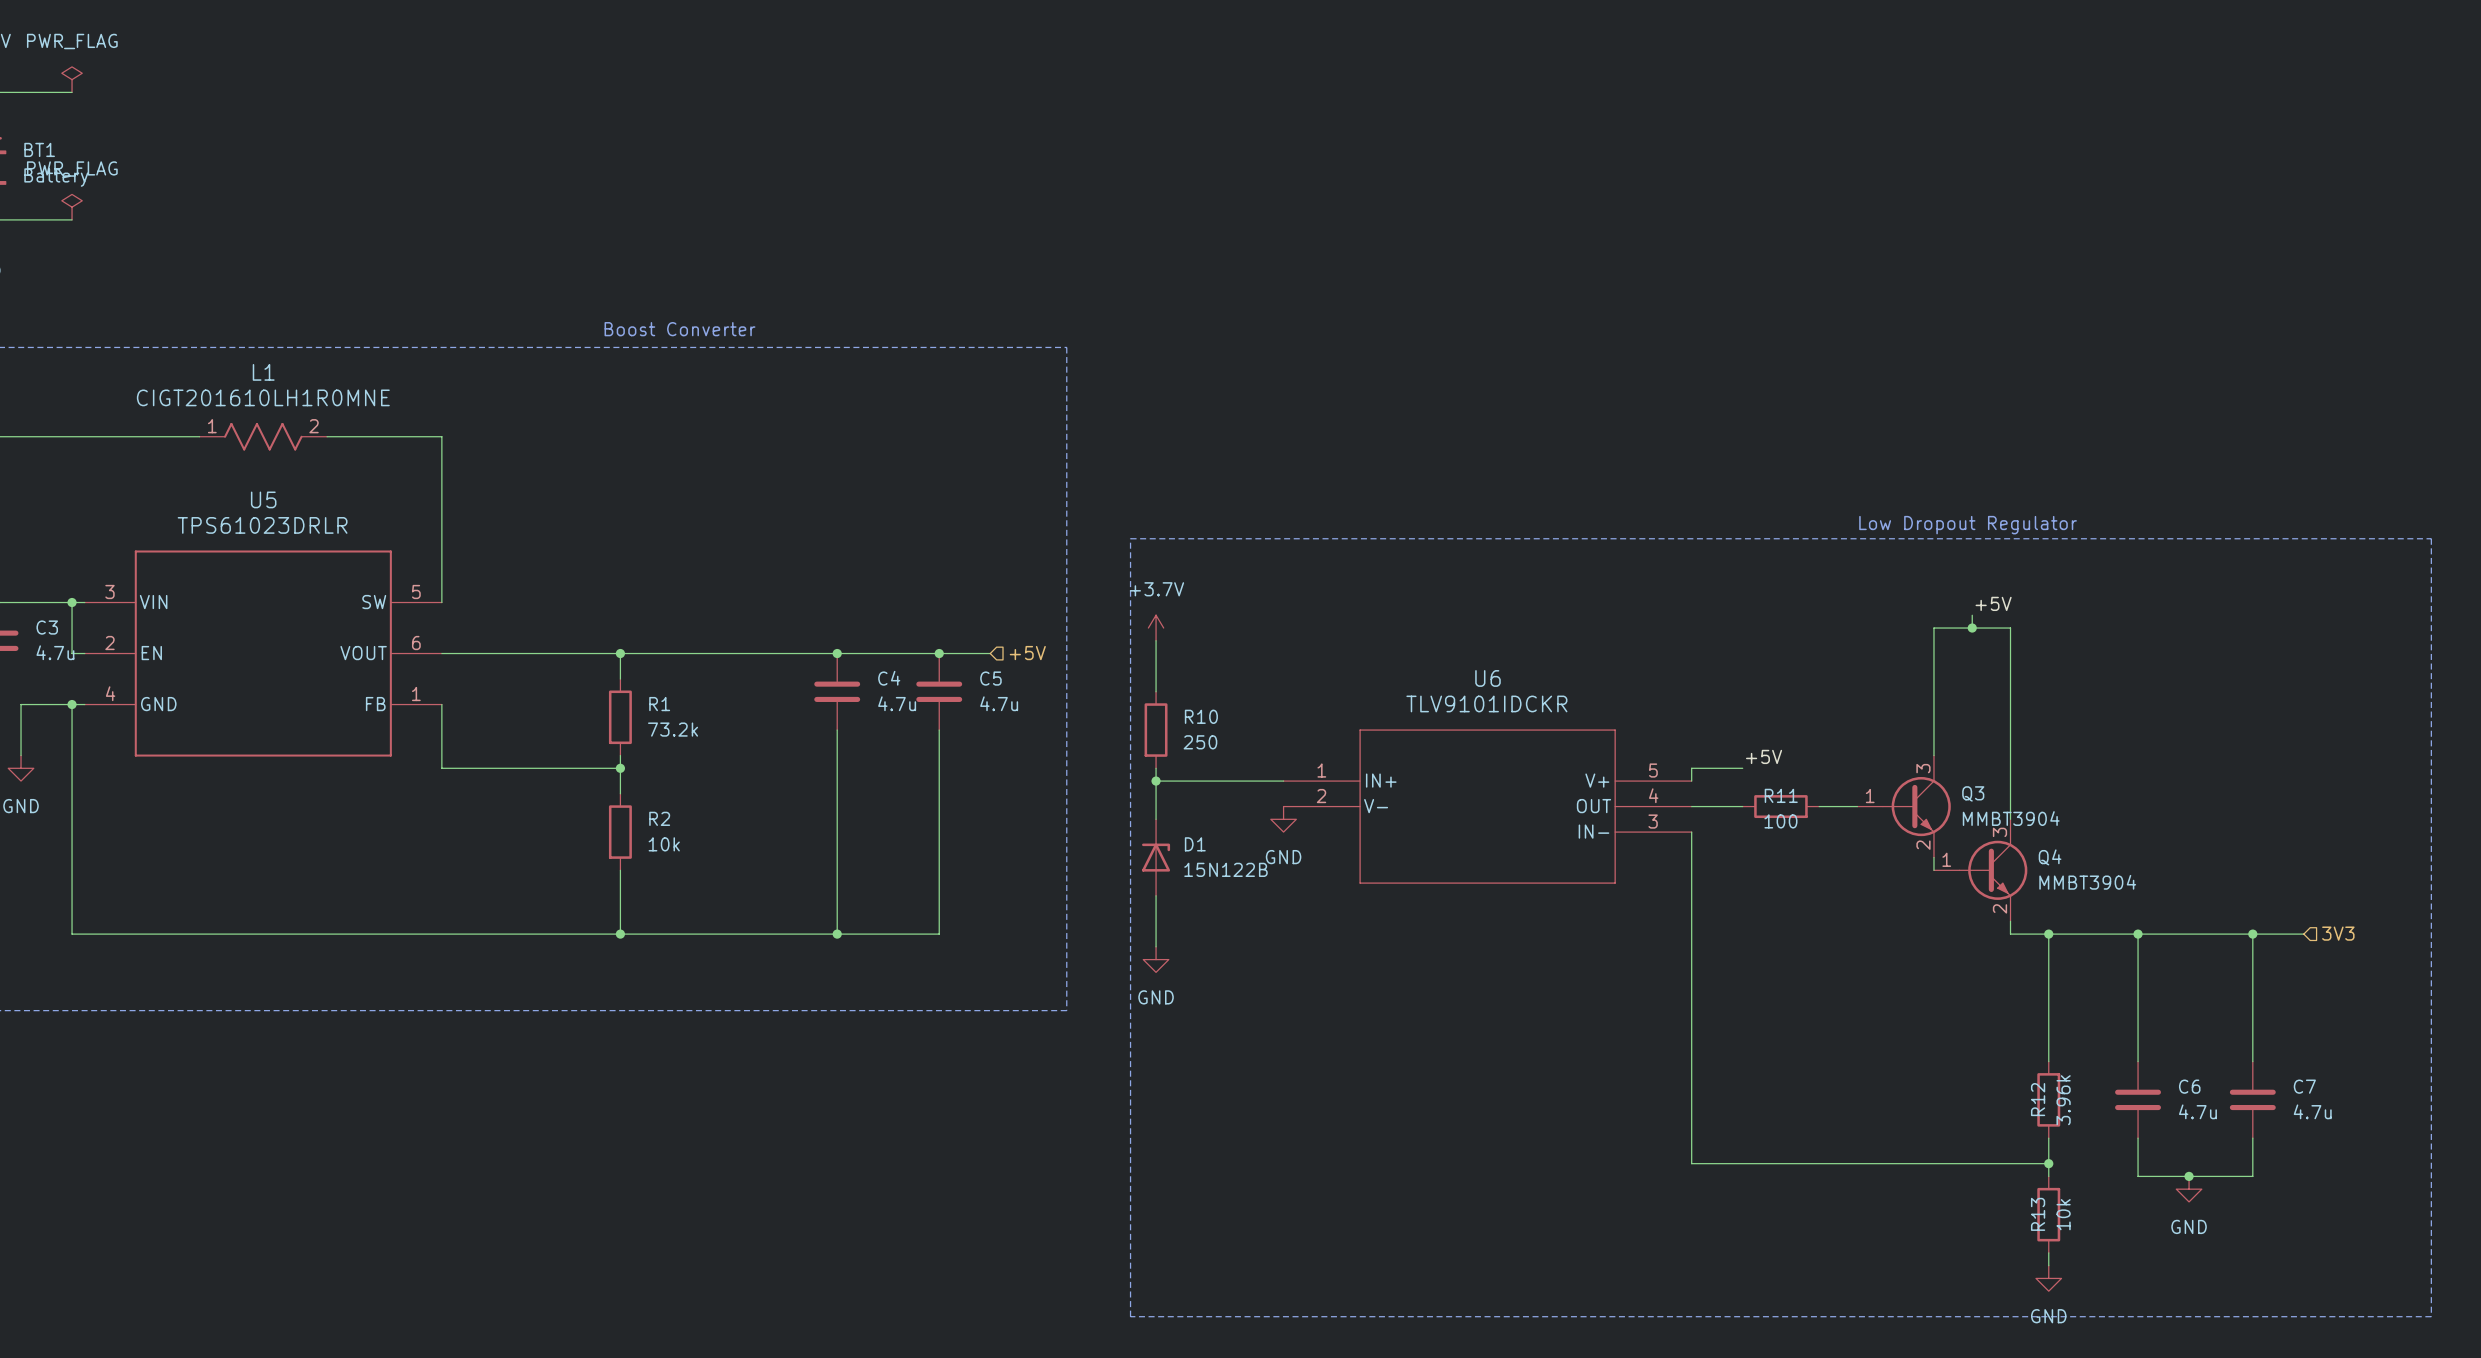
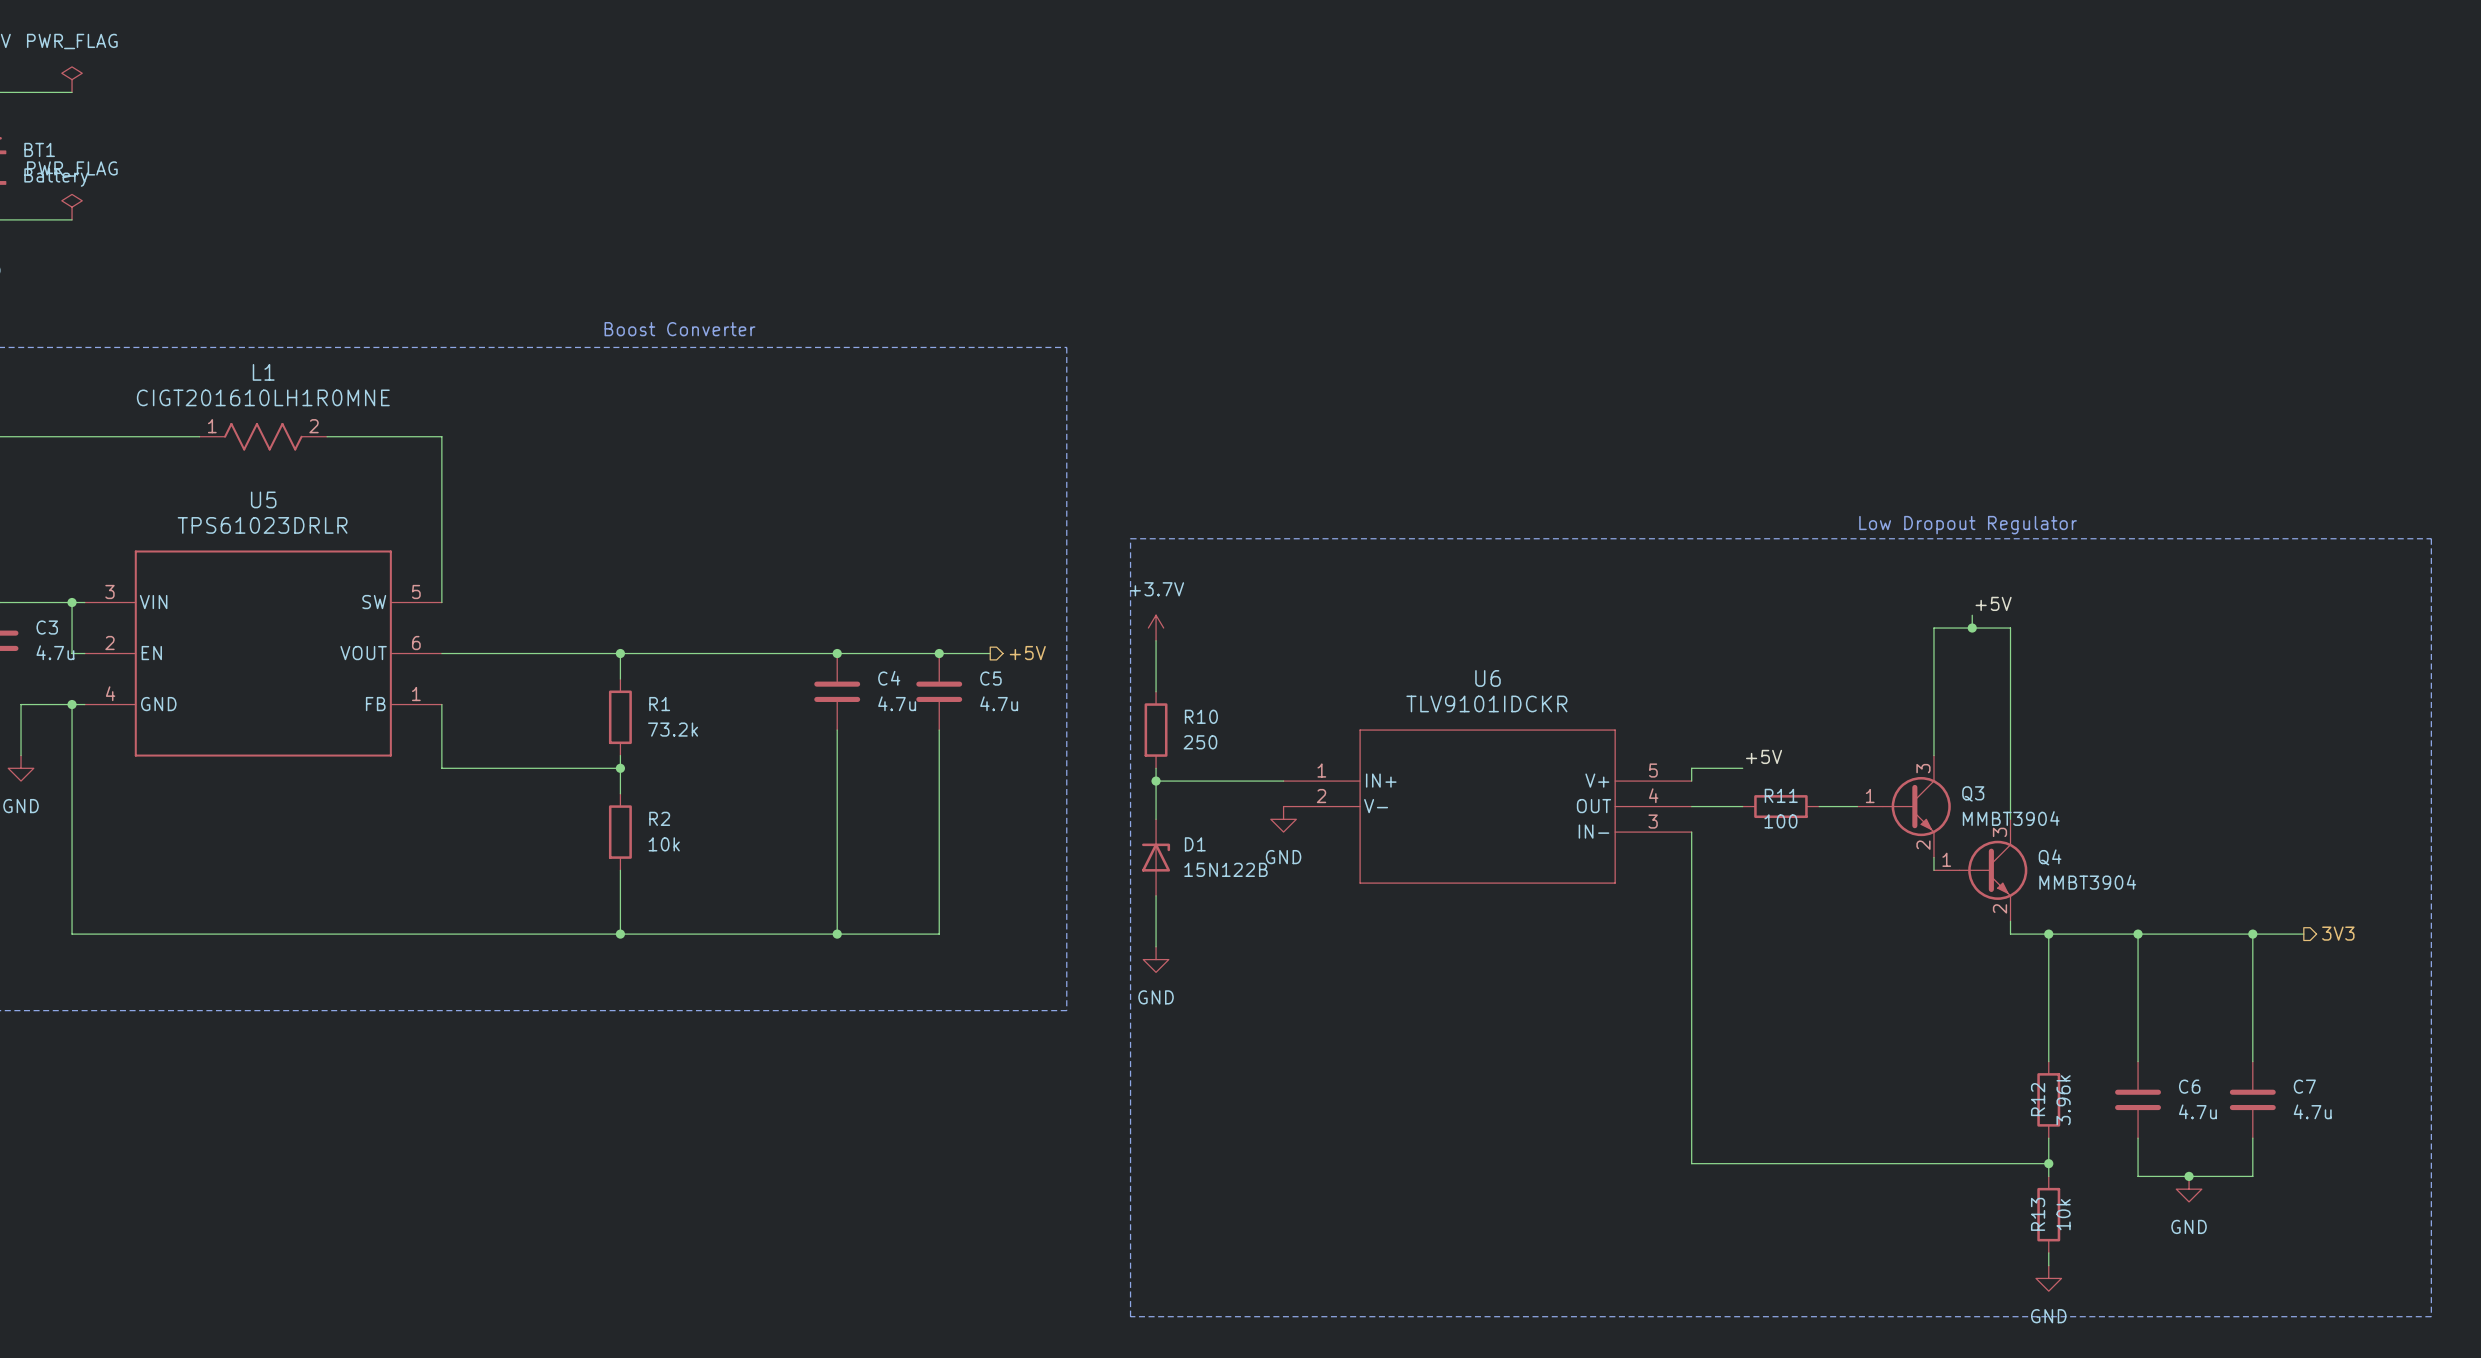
hierarchical label shape: input (1027, 653) -> output (1027, 653)
hierarchical label shape: input (2338, 933) -> output (2338, 933)

